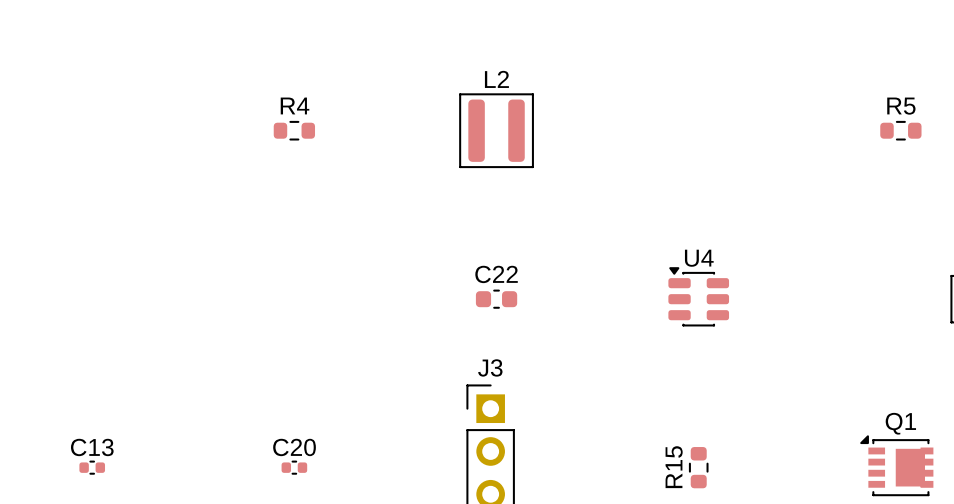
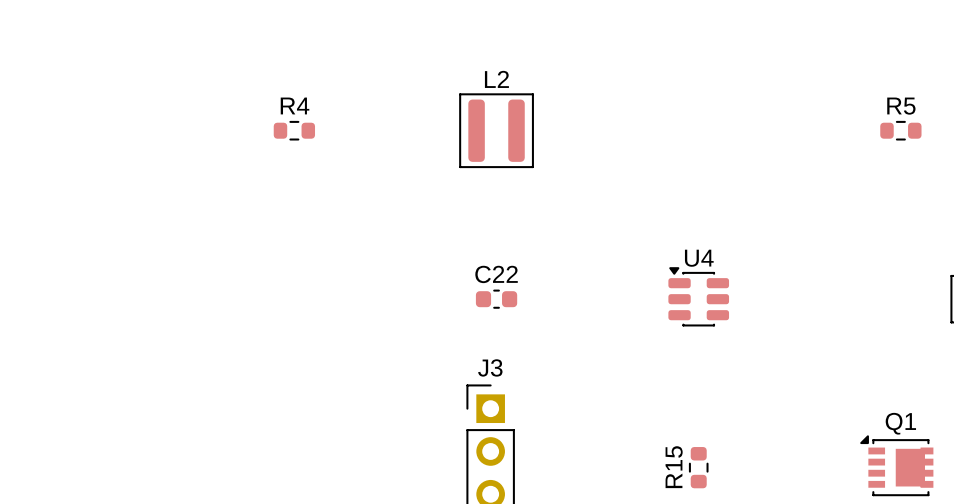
C13: (92, 467) -> none
C20: (294, 467) -> none

